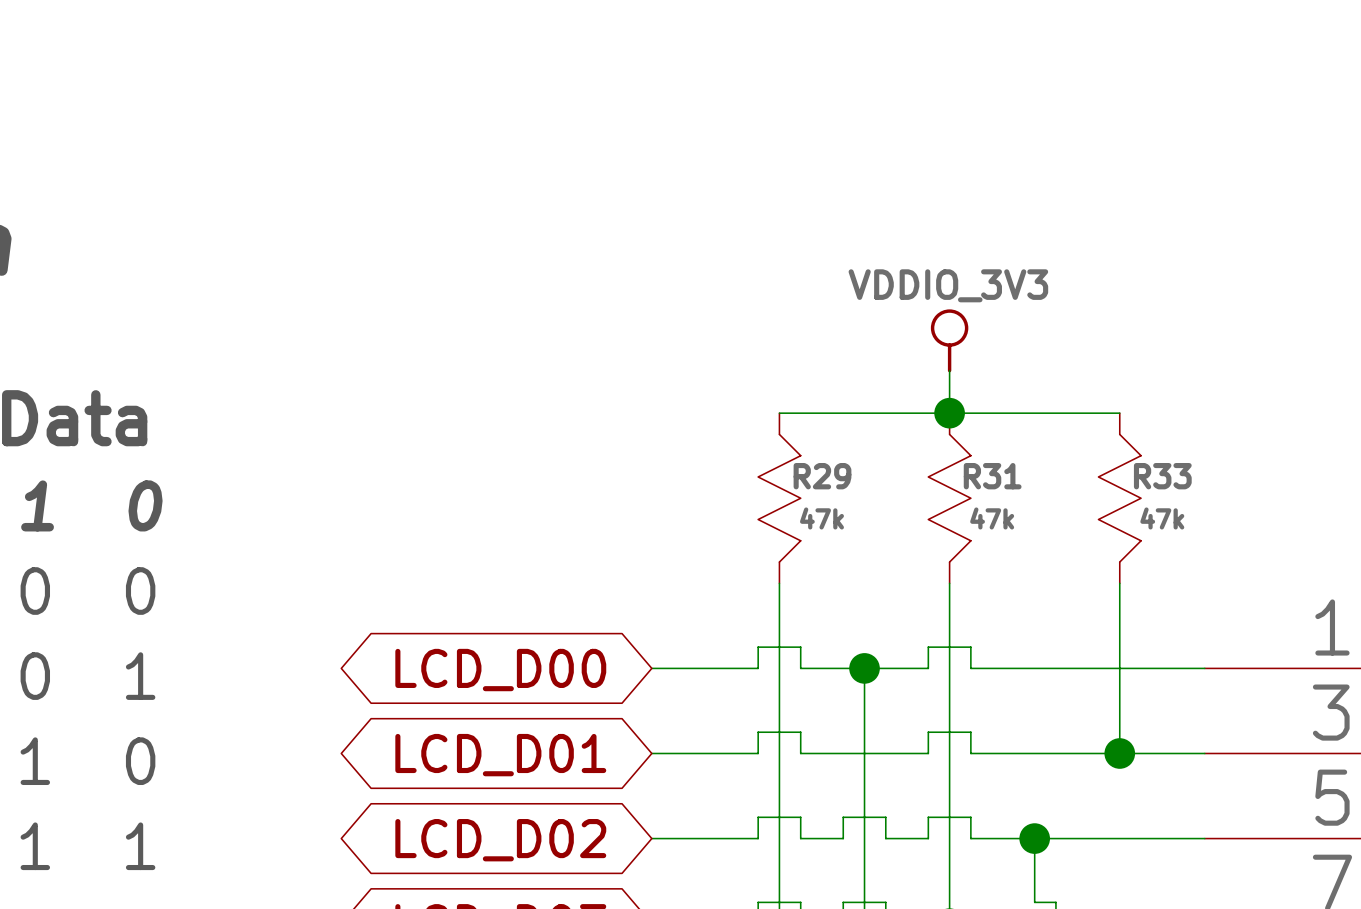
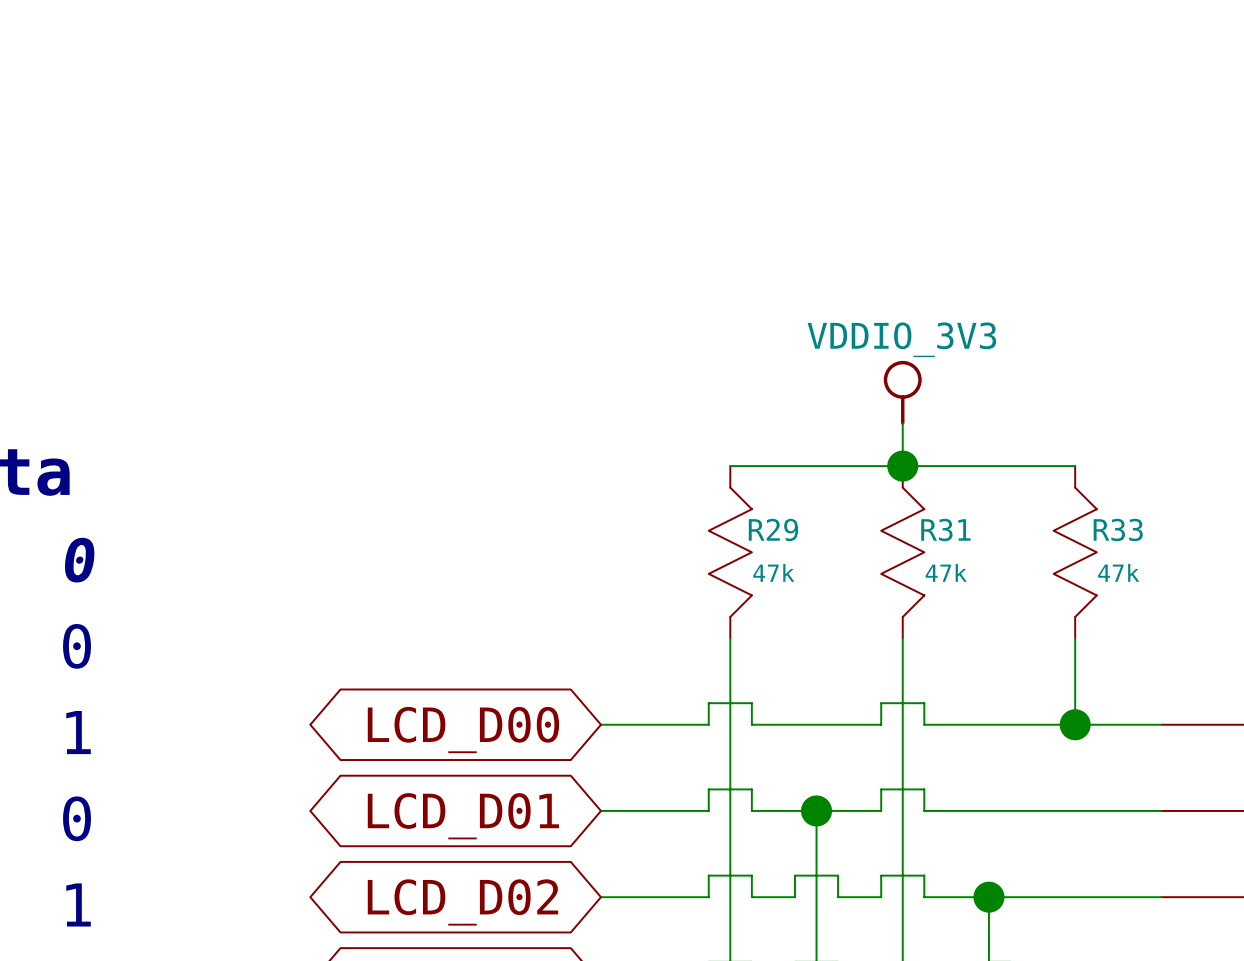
wire: (864, 668) (864, 753) -> none
junction position: (864, 668) -> (816, 810)
wire: (1119, 668) (1119, 753) -> none
junction position: (1119, 753) -> (1075, 724)

